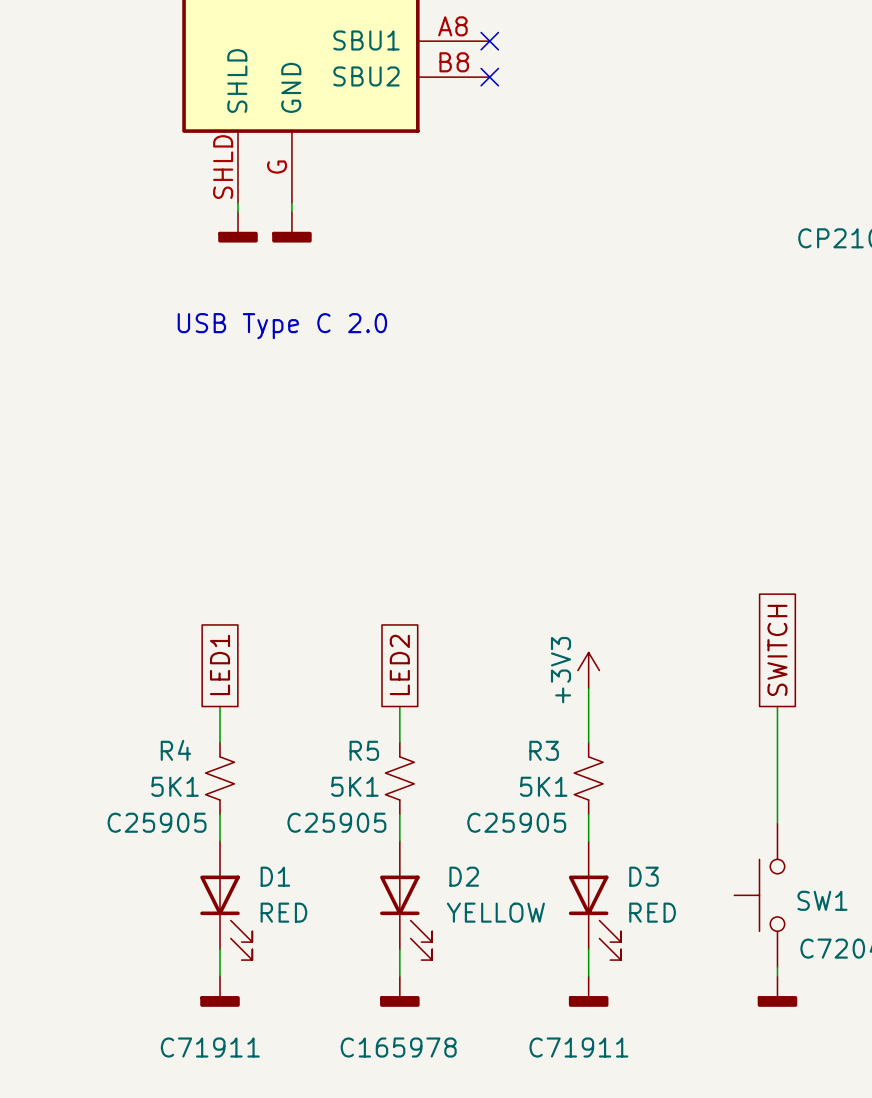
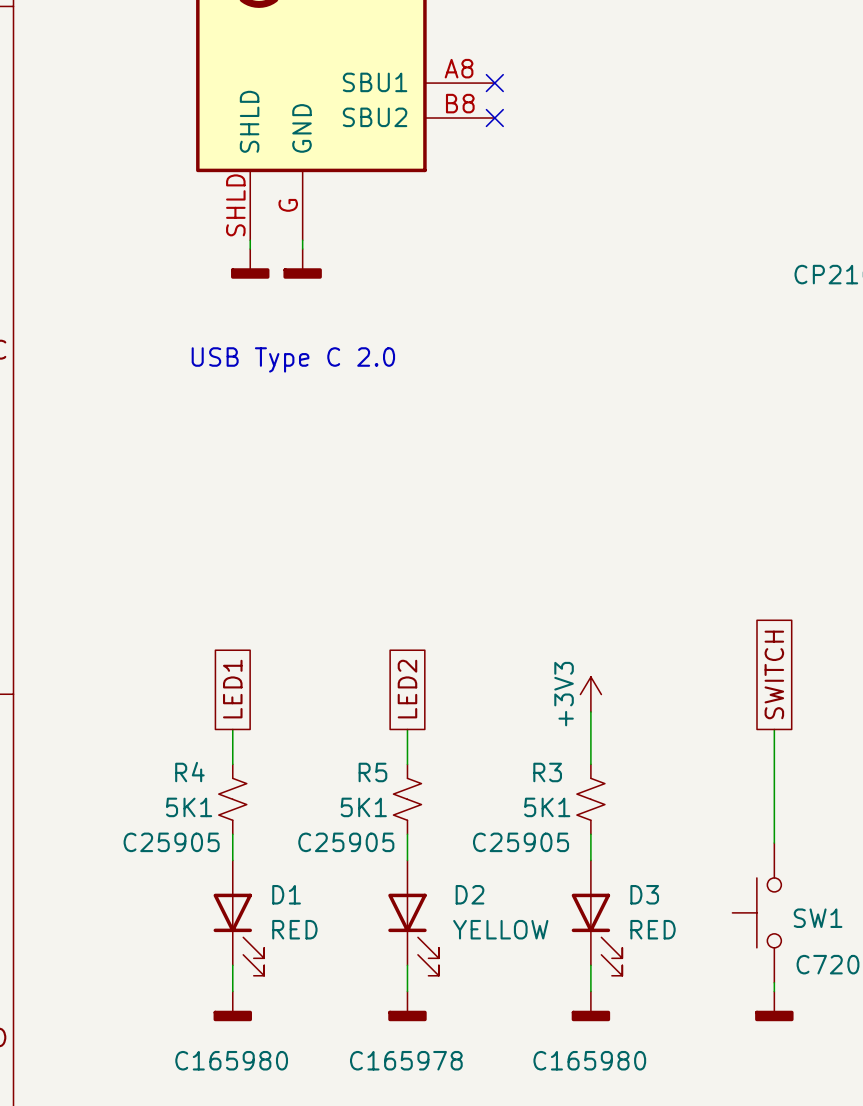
D1 text: C71911 (210, 1047) -> C165980 (231, 1060)
D3 text: C71911 (578, 1047) -> C165980 (589, 1060)

